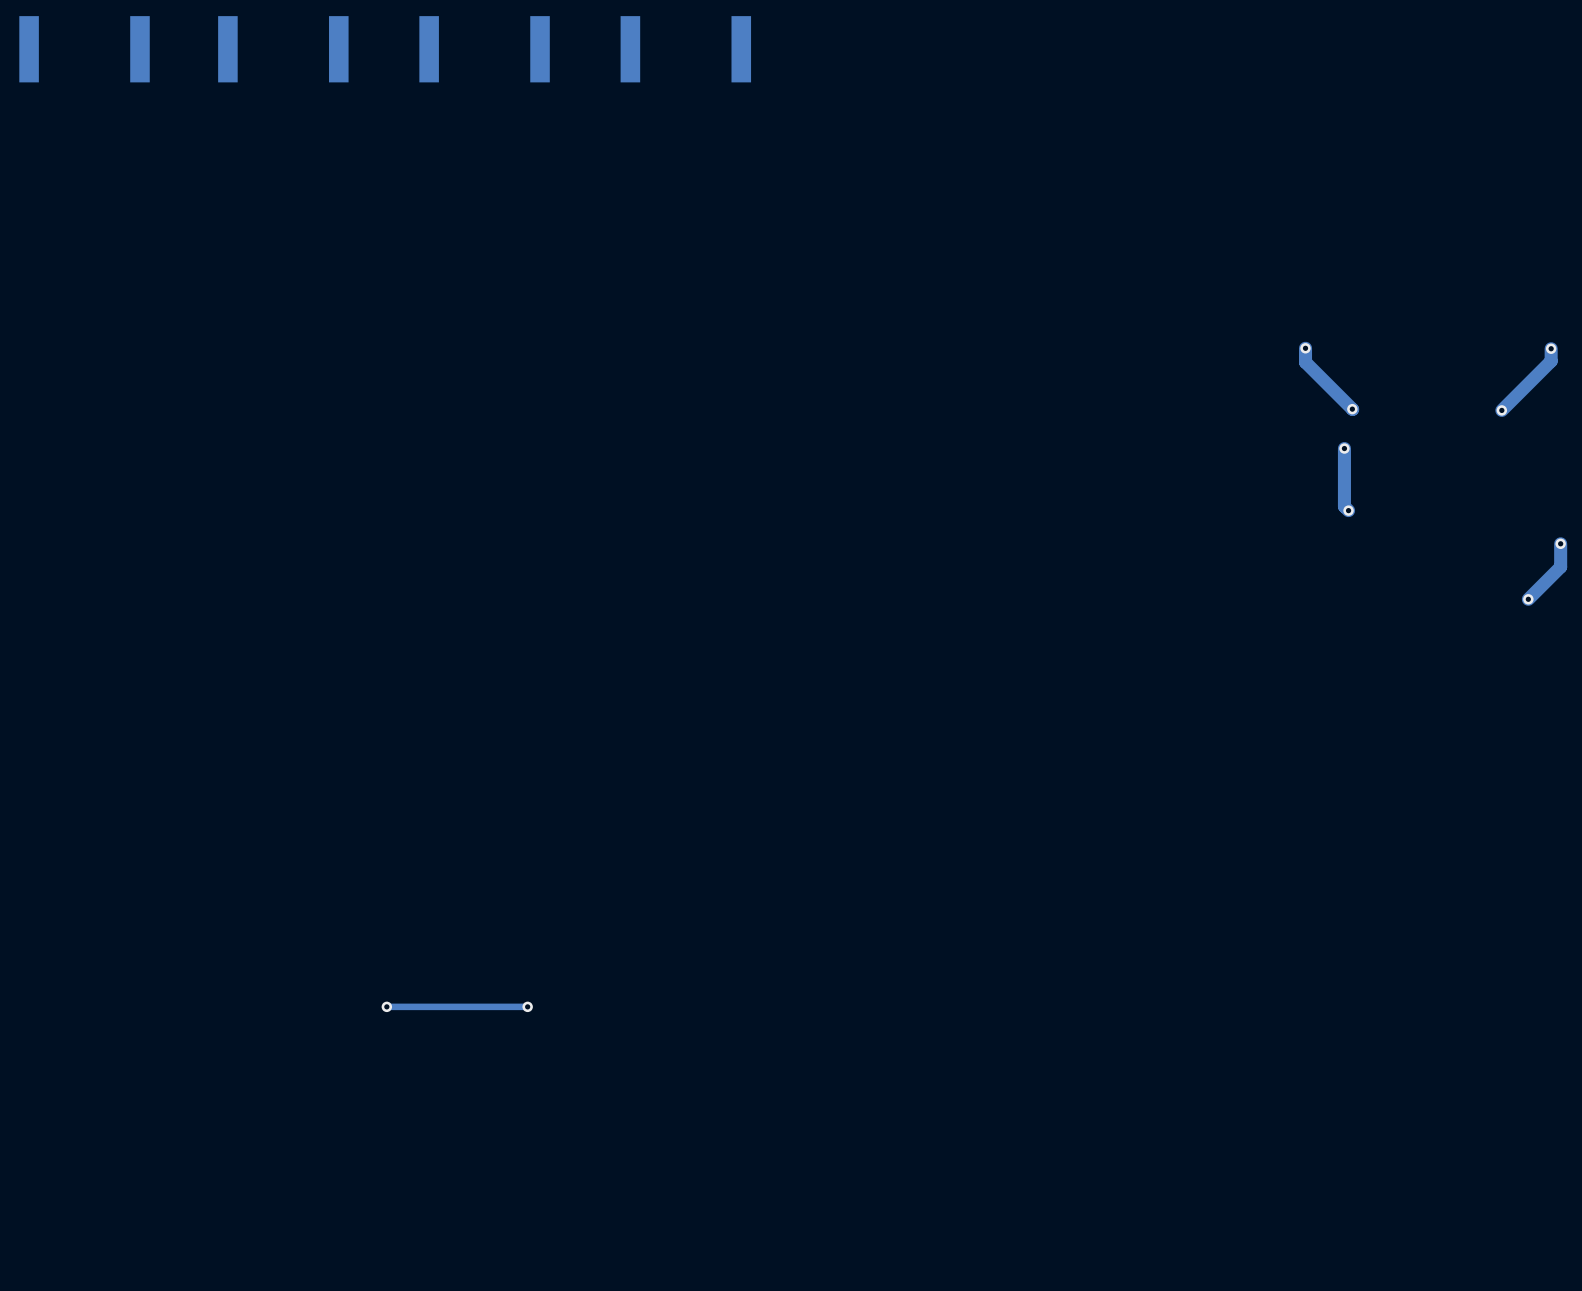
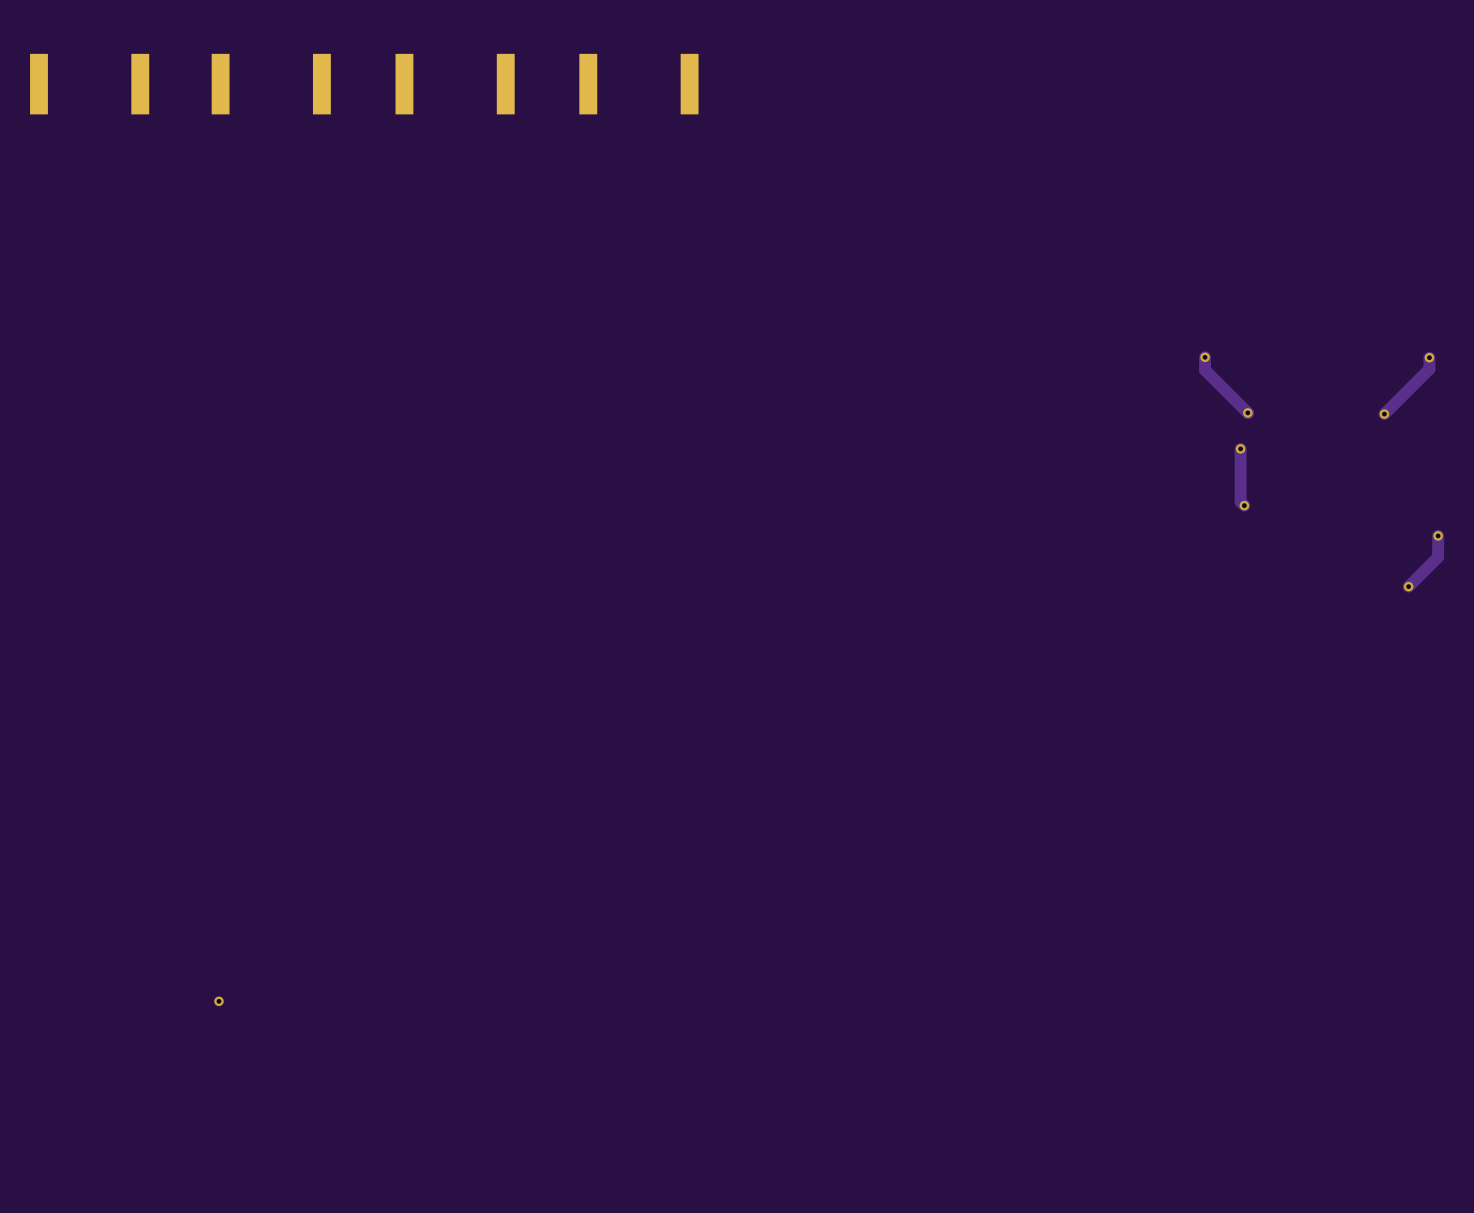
via: (386, 1006) -> none
track: (527, 1006) (386, 1006) -> none
via: (527, 1006) -> none
via: none -> (218, 1001)

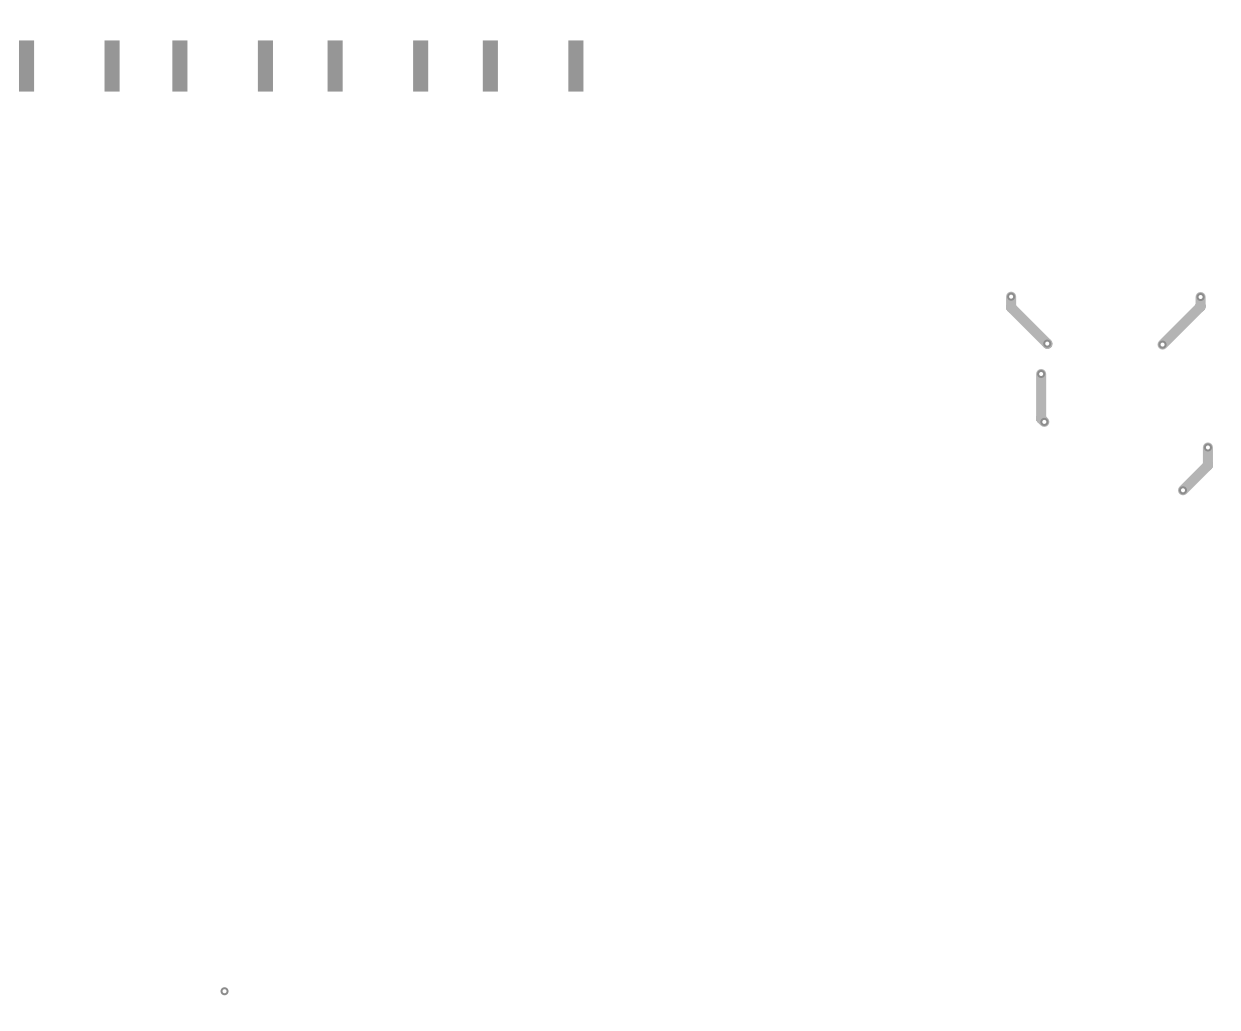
via: (218, 1001) -> none
via: none -> (224, 991)

